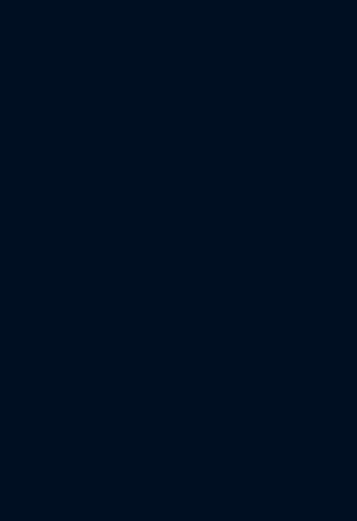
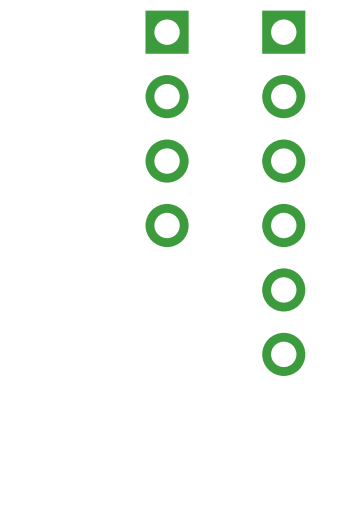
part: none -> (167, 128)
part: none -> (283, 193)

